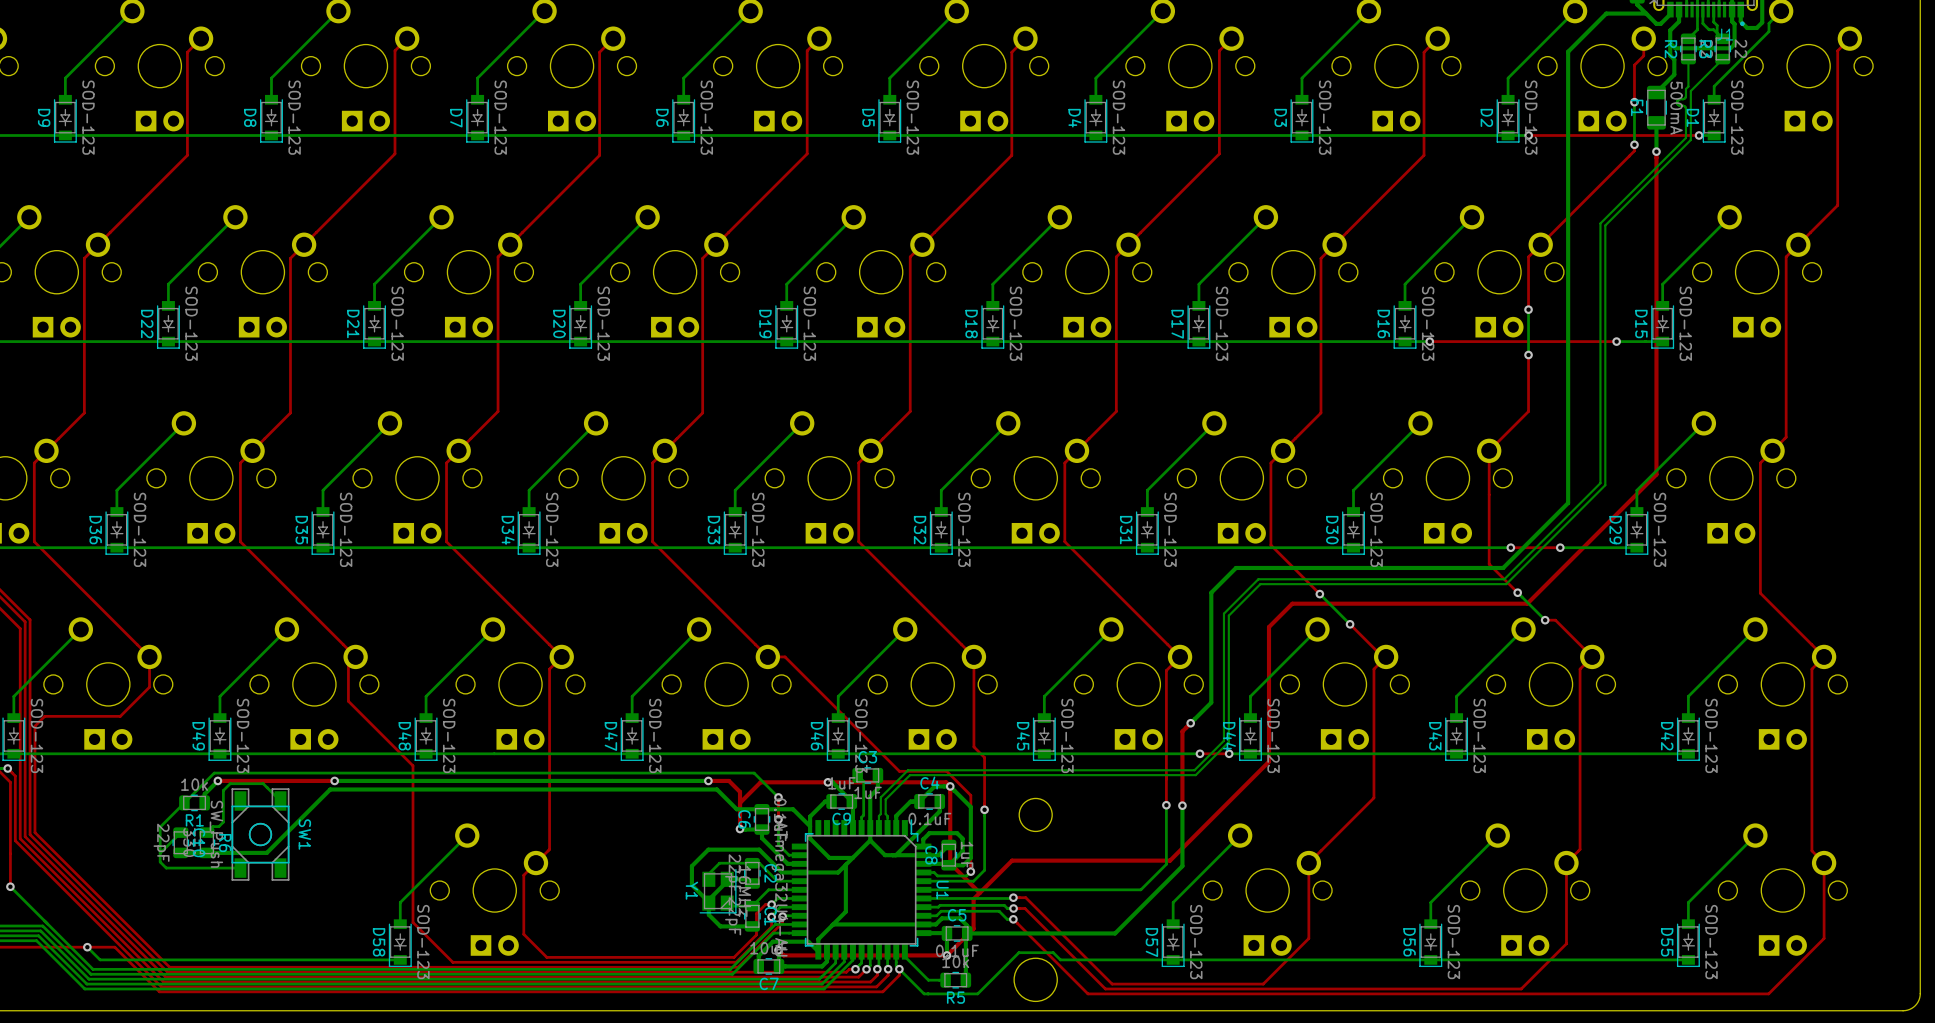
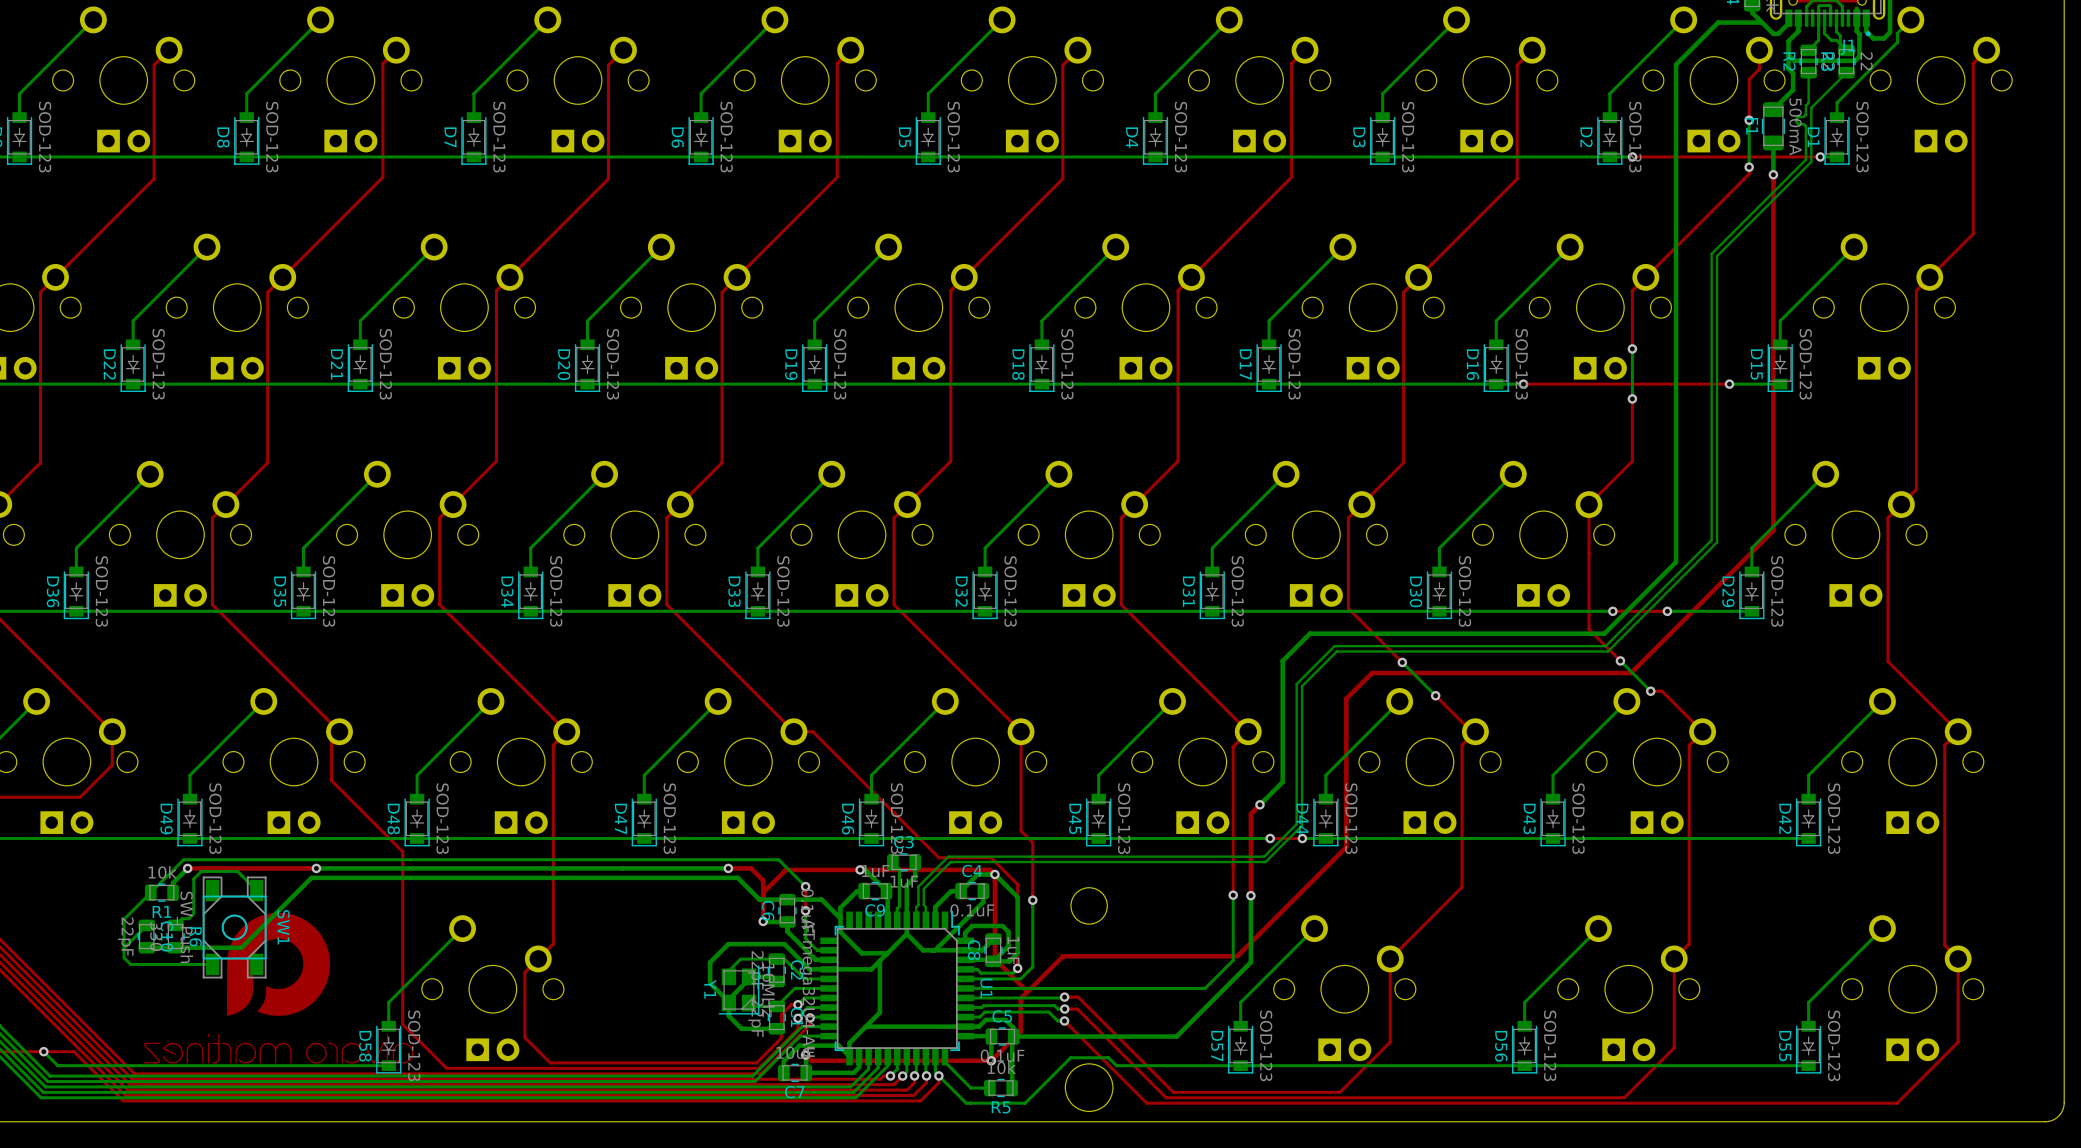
drawing: none -> [143, 912, 414, 1064]

